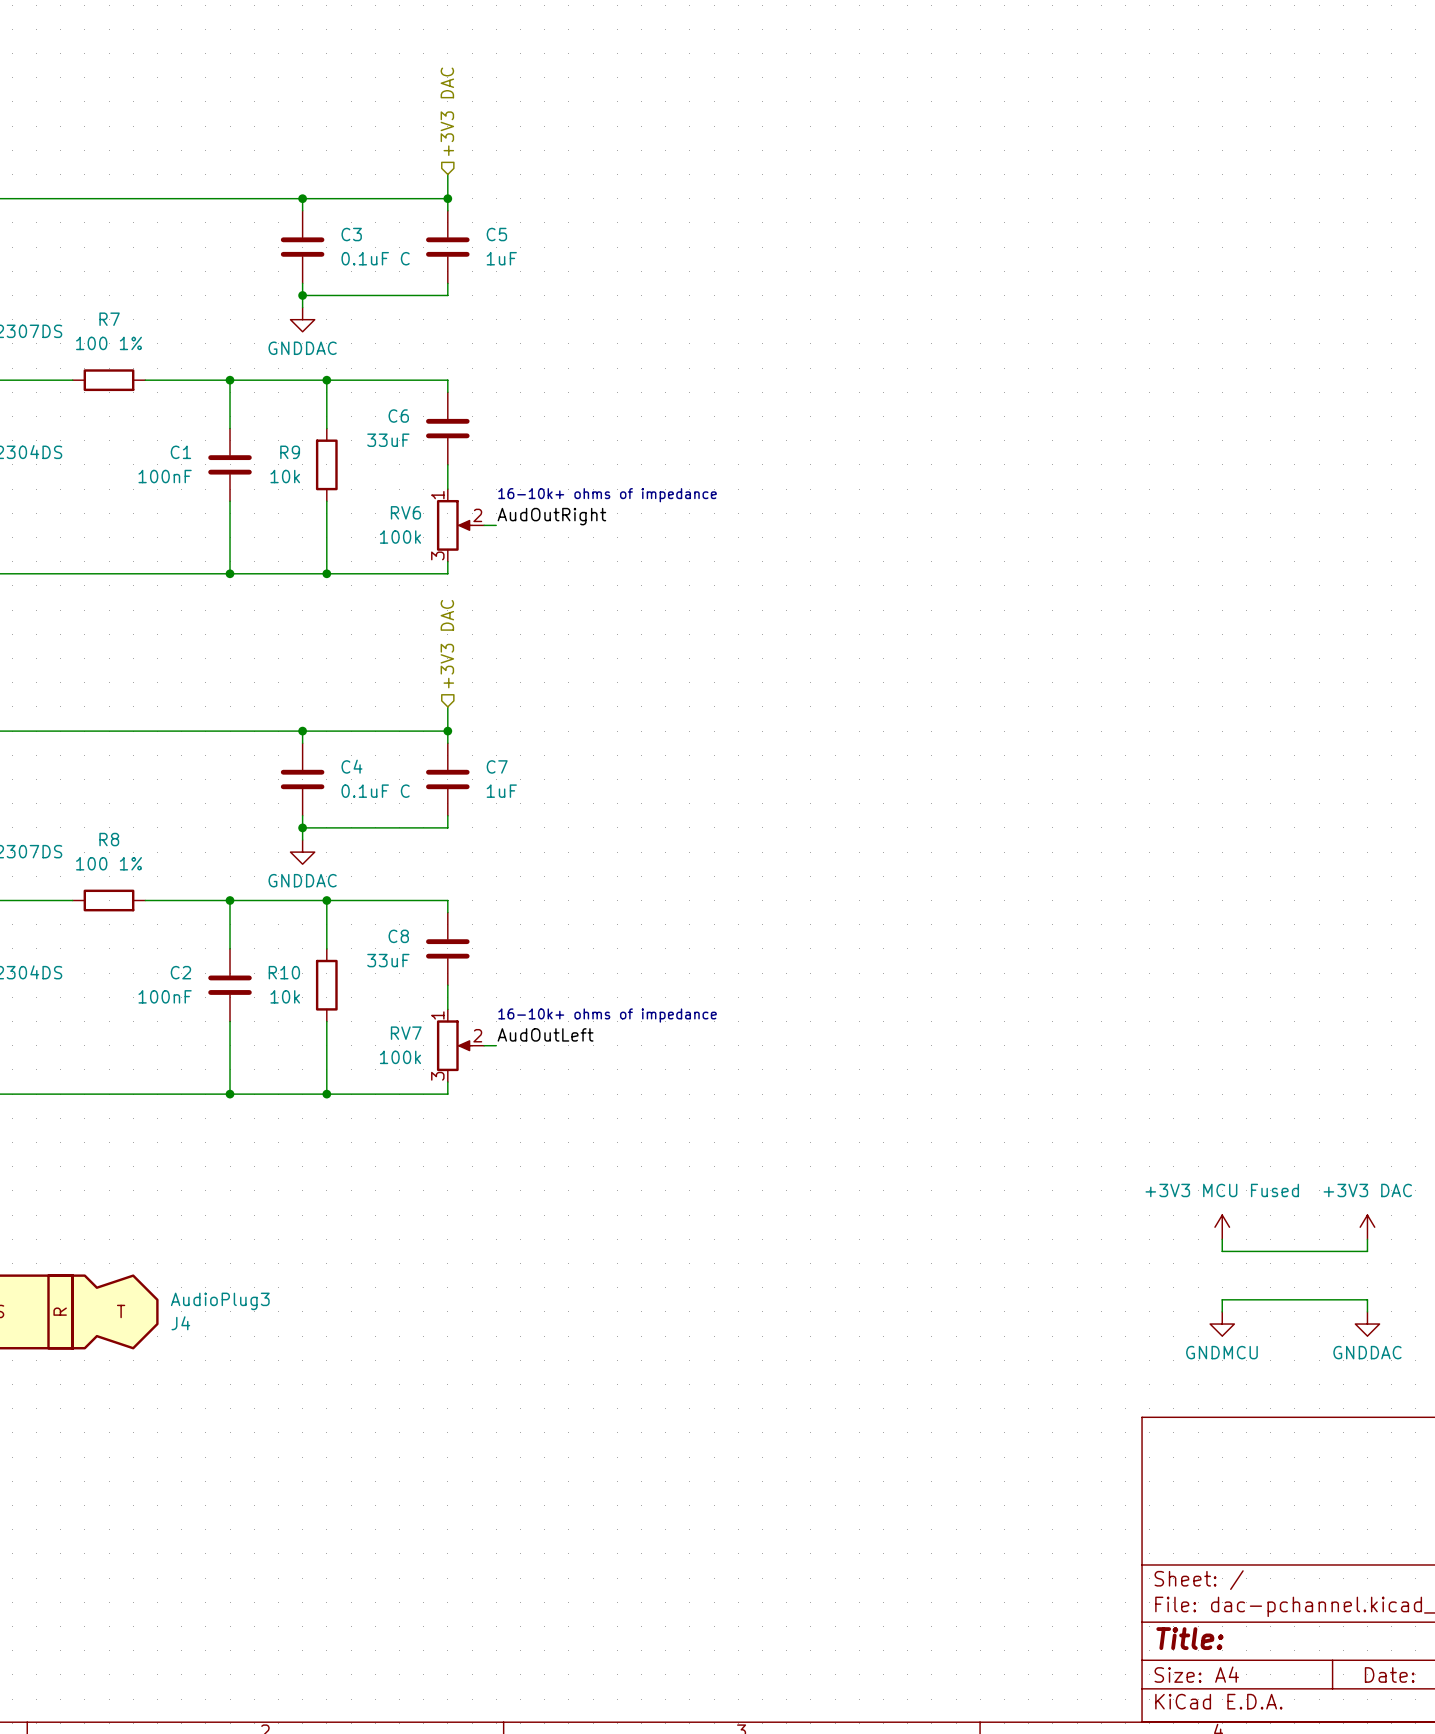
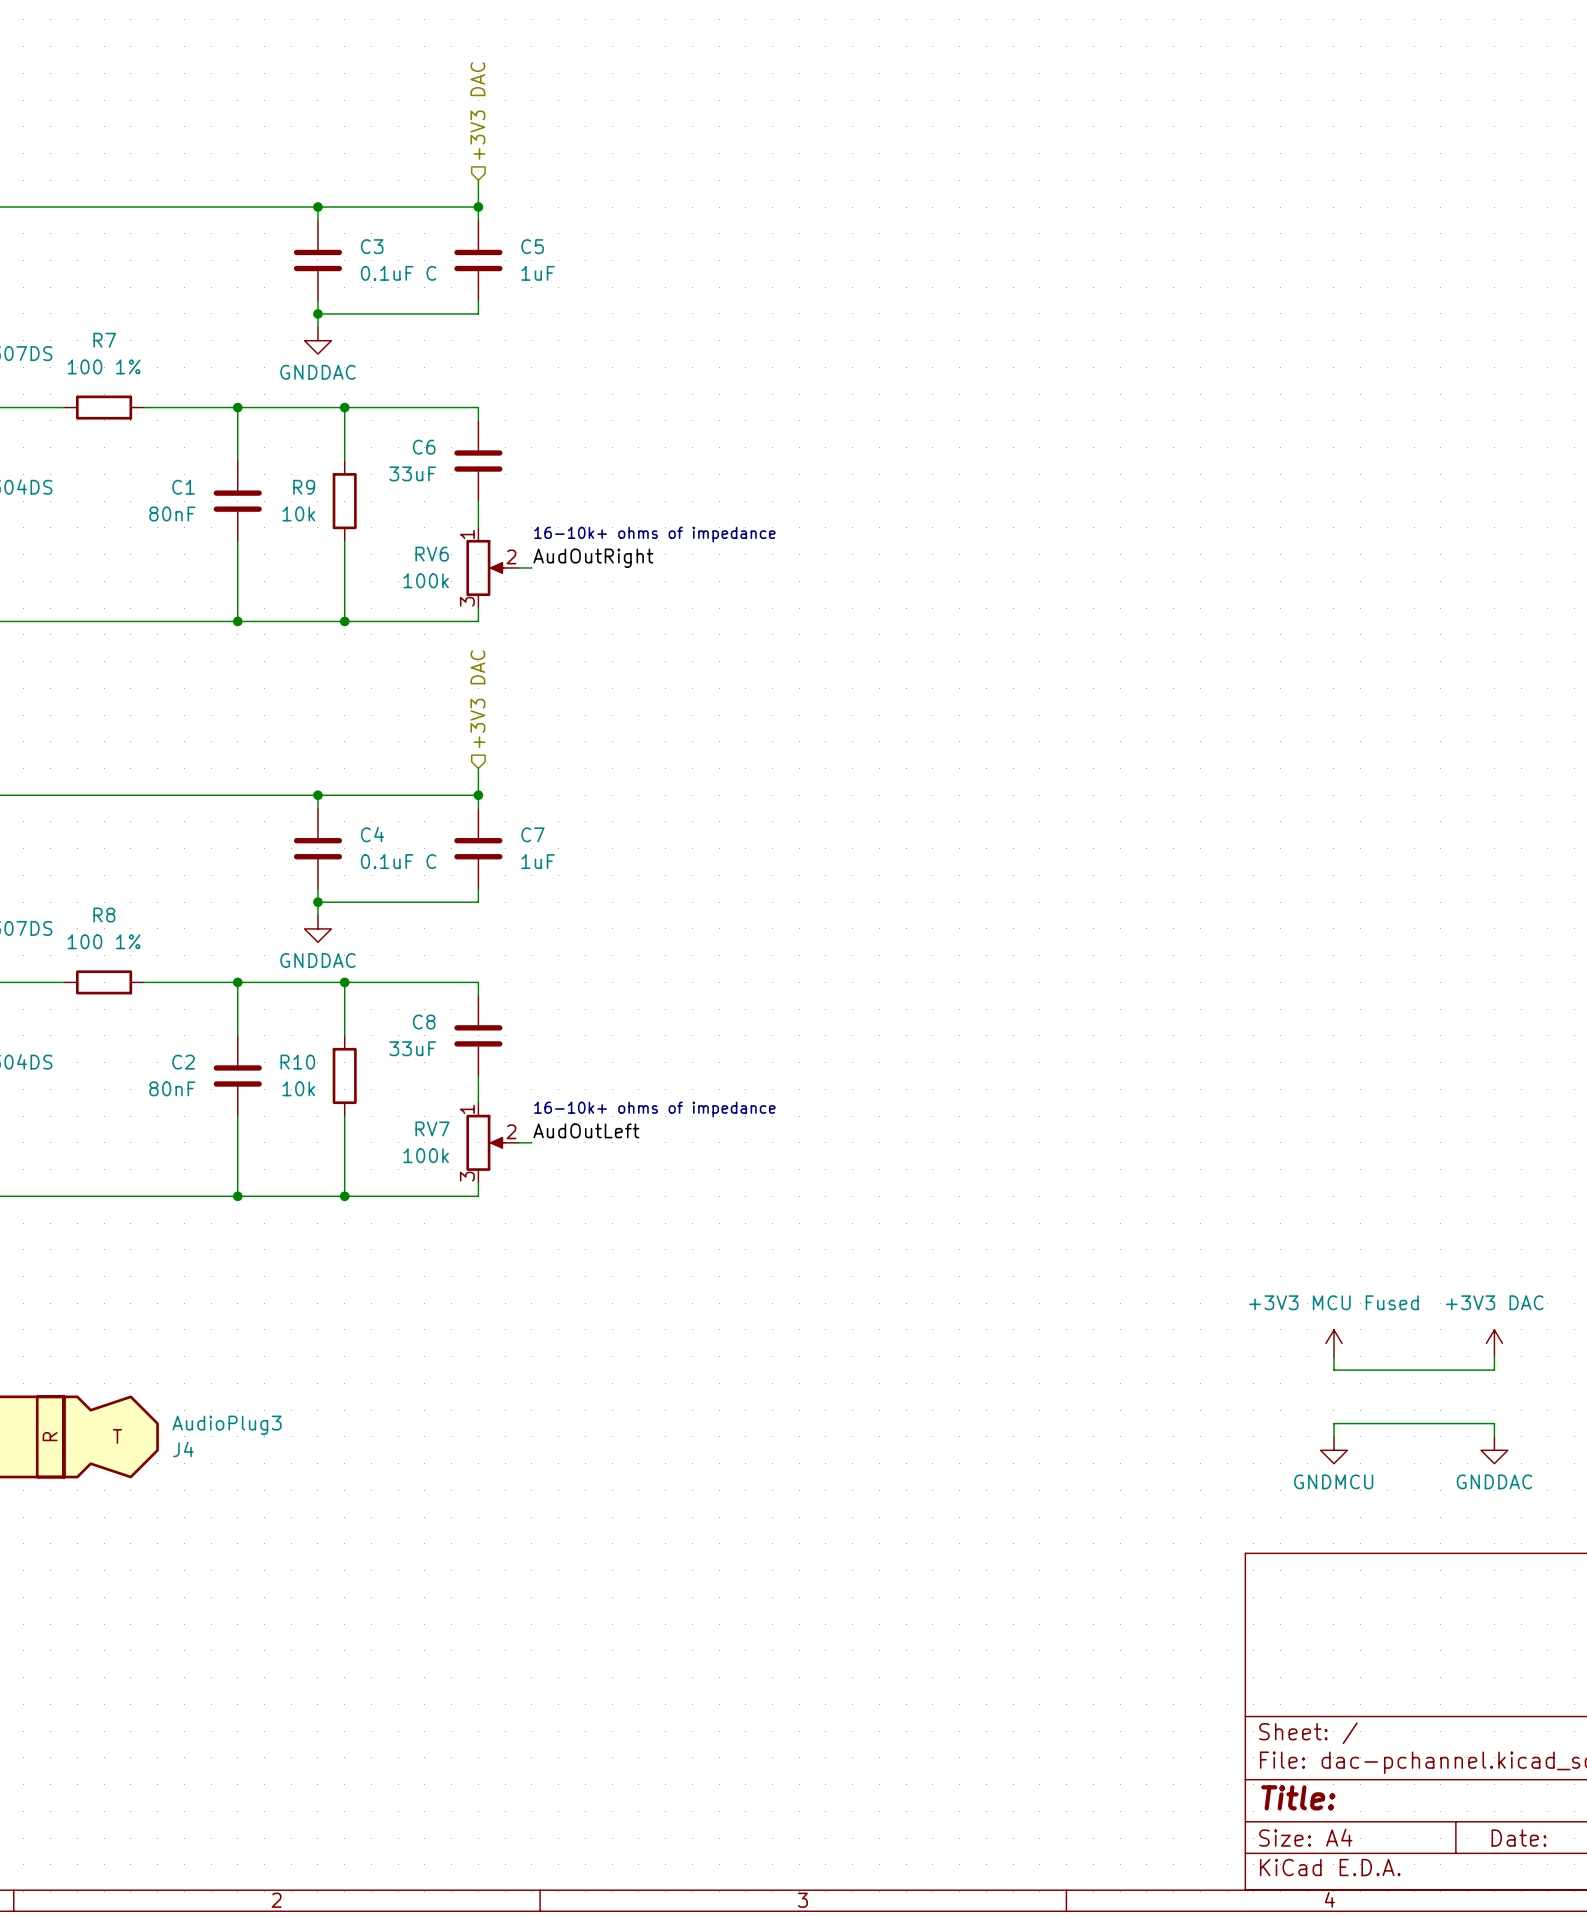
C1 value: 100nF (165, 476) -> 80nF (172, 514)
C2 value: 100nF (165, 996) -> 80nF (172, 1088)

